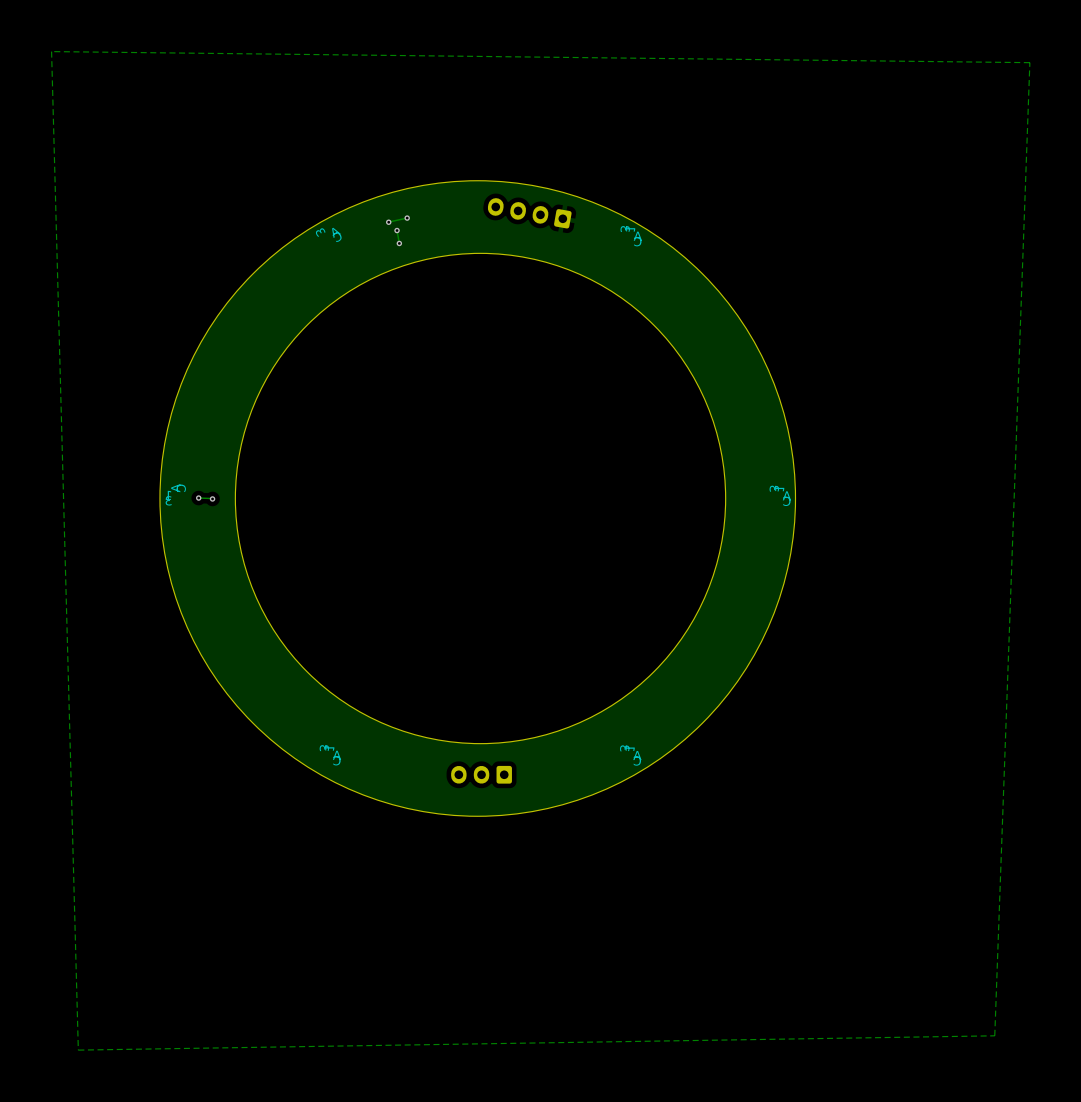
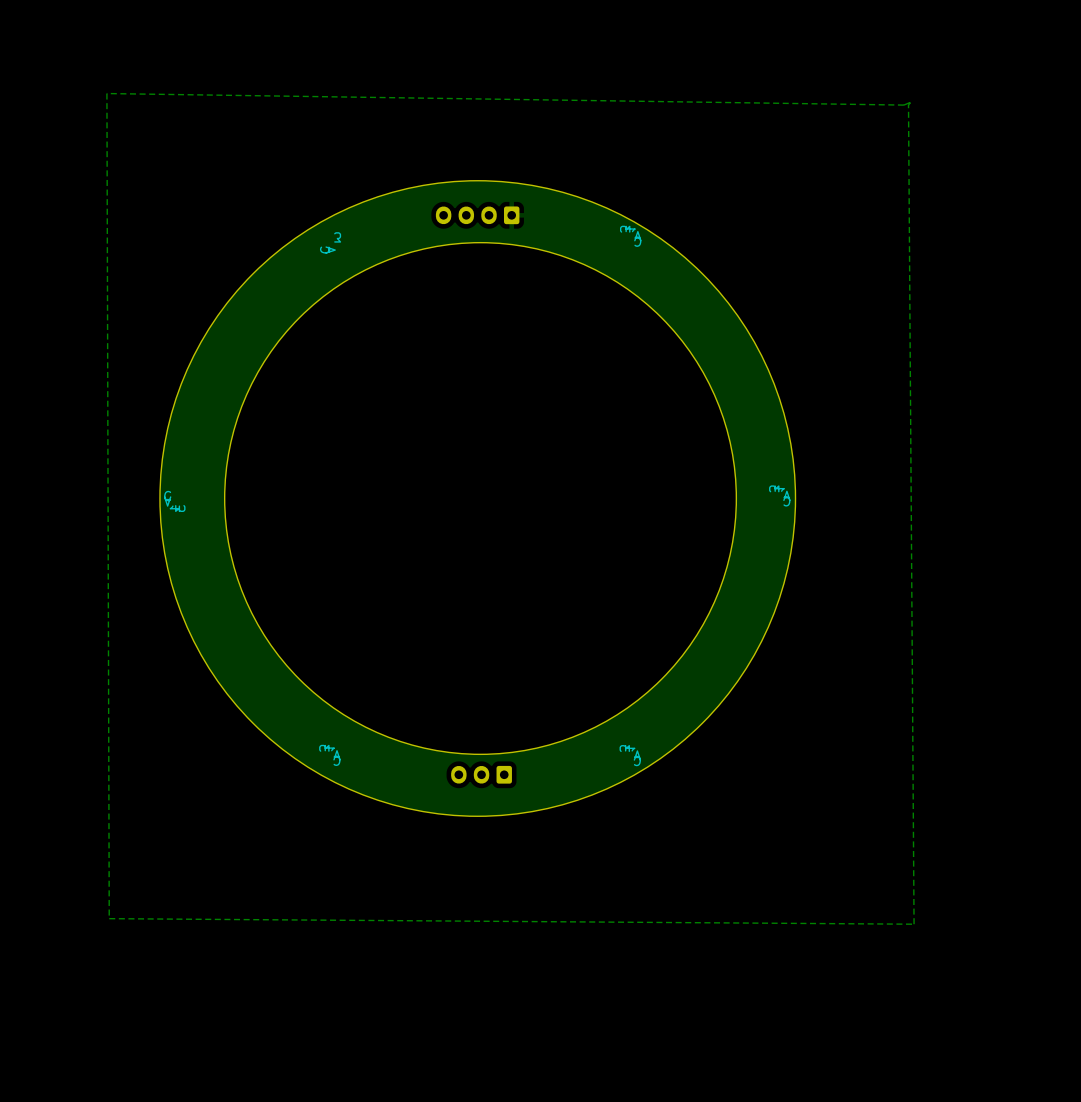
zone outline: (51, 51) (1029, 62) (994, 1035) (78, 1050) (51, 51) -> (106, 93) (903, 105) (910, 102) (908, 105) (914, 924) (109, 918) (106, 93)
part: (529, 213) -> none
part: none -> (477, 215)
track: (407, 218) (388, 222) -> none
via: (407, 218) -> none
via: (388, 222) -> none
track: (397, 230) (399, 243) -> none
via: (397, 230) -> none
part rotation: 0° (328, 234) -> 120° clockwise (330, 242)
via: (399, 243) -> none
round board edge size: [234, 252, 727, 745] -> [224, 242, 737, 755]
part rotation: 0° (175, 494) -> 90° counterclockwise (174, 501)
track: (198, 498) (212, 498) -> none
via: (198, 498) -> none
via: (212, 498) -> none

